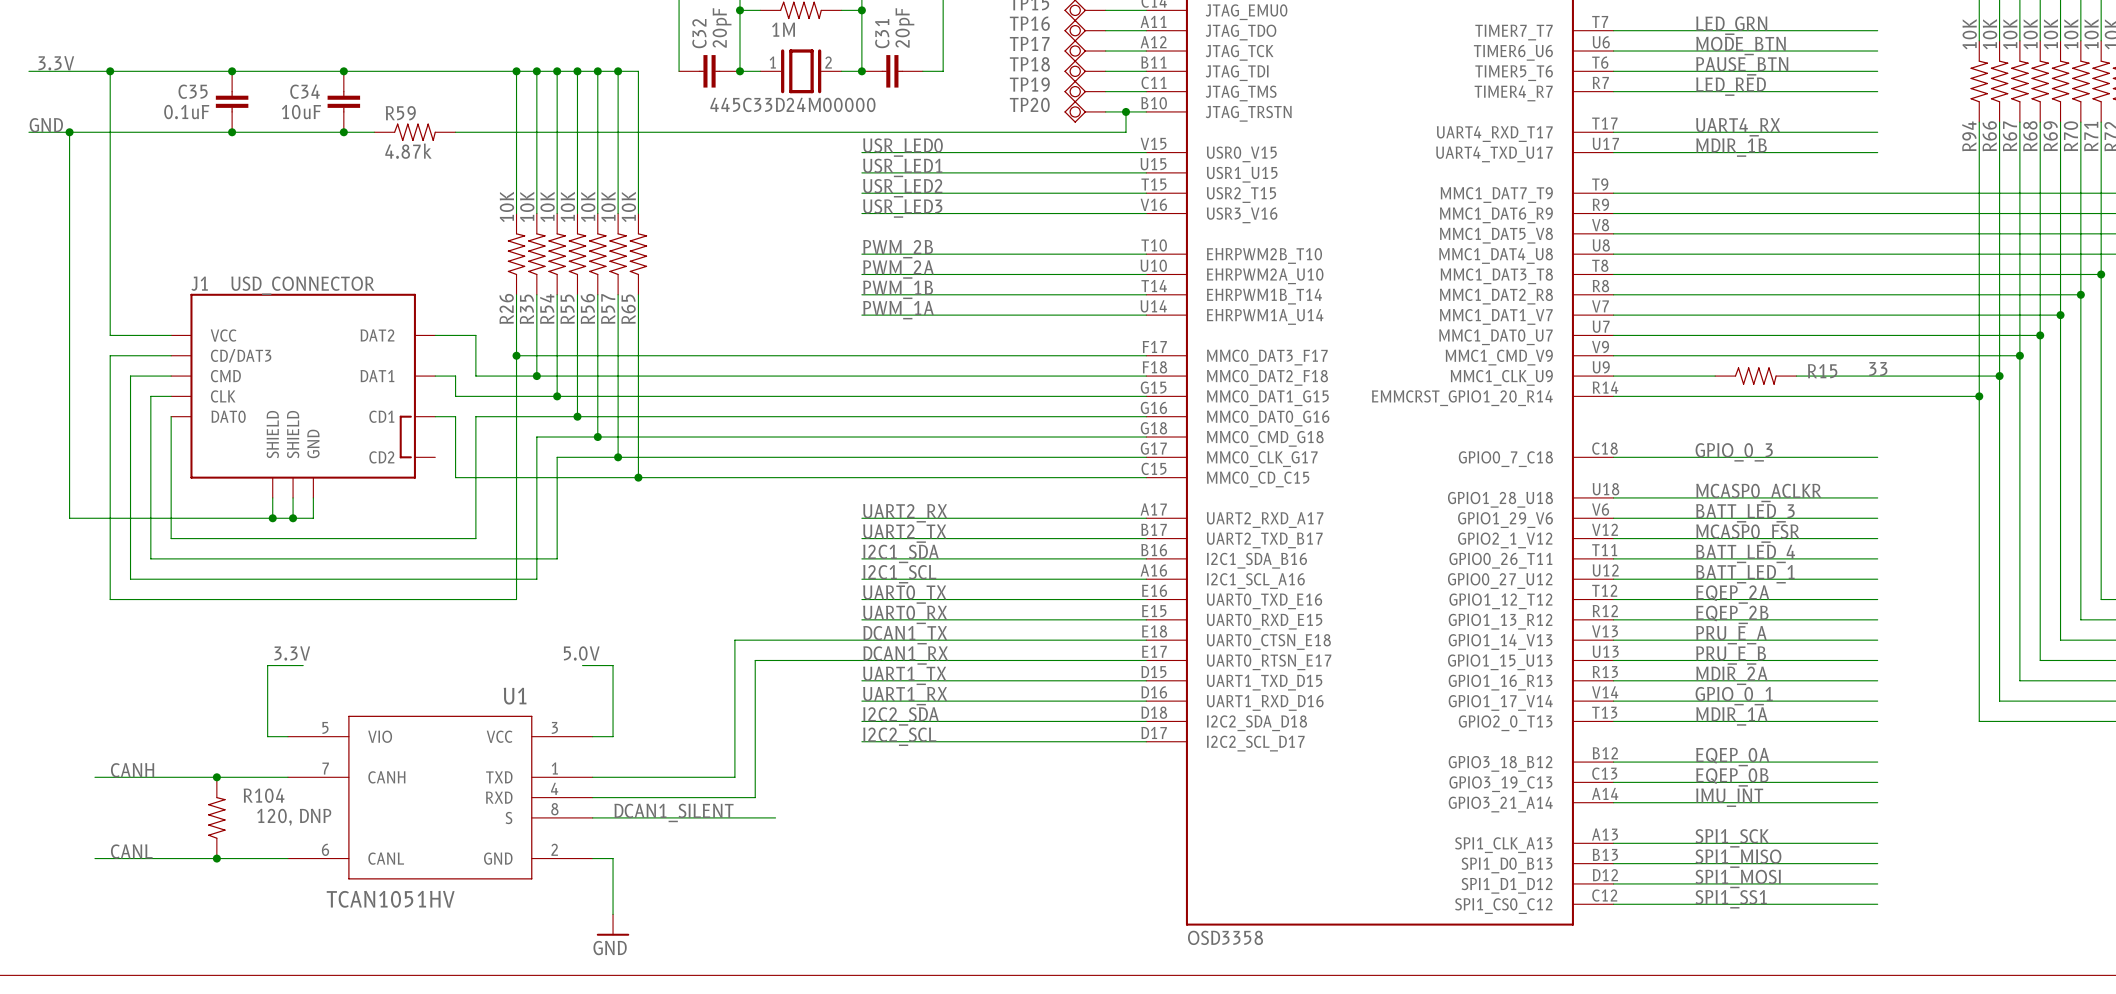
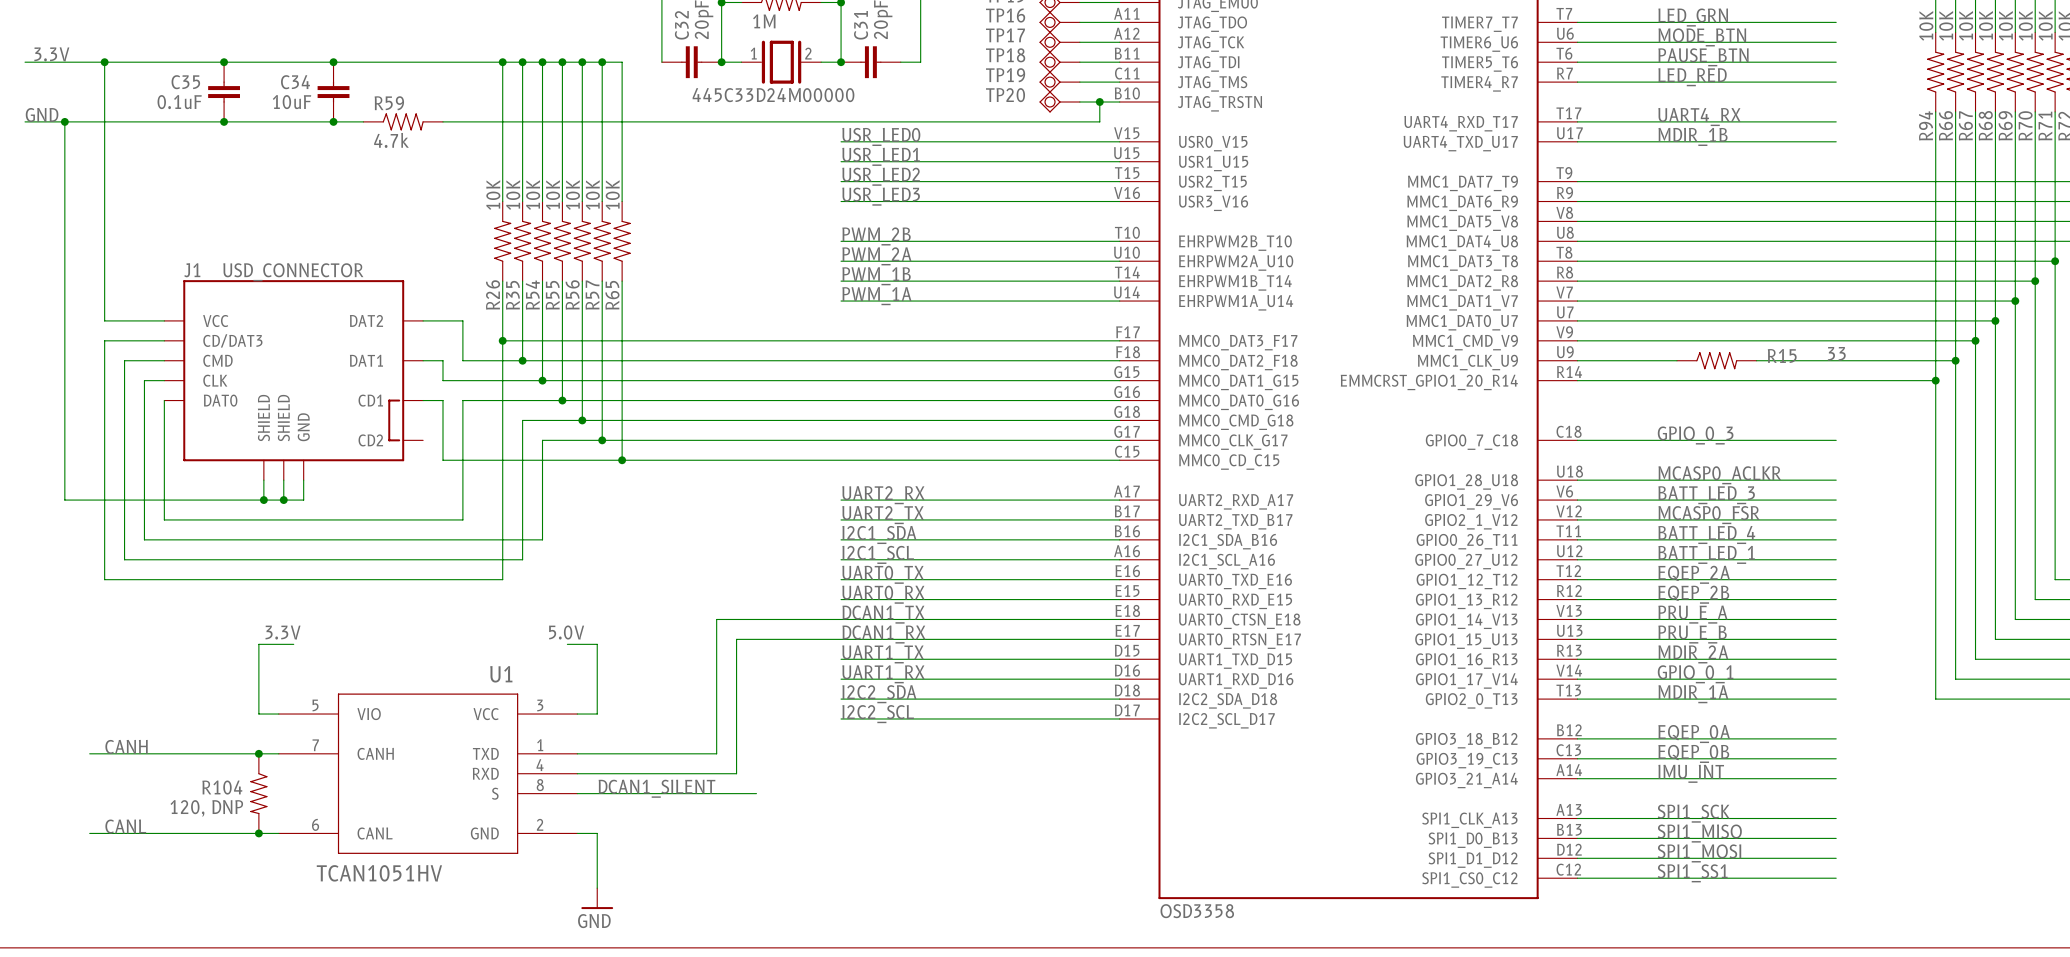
R59 value: 4.87k (408, 151) -> 4.7k (391, 140)
junction: (216, 777) -> none
junction: none -> (258, 753)
R104 name position: R104 (264, 795) -> R104 (222, 787)
R104 rotation: 0° (216, 817) -> 180° (258, 793)
R104 position: (216, 817) -> (258, 793)
junction: (216, 858) -> none
junction: none -> (258, 833)

